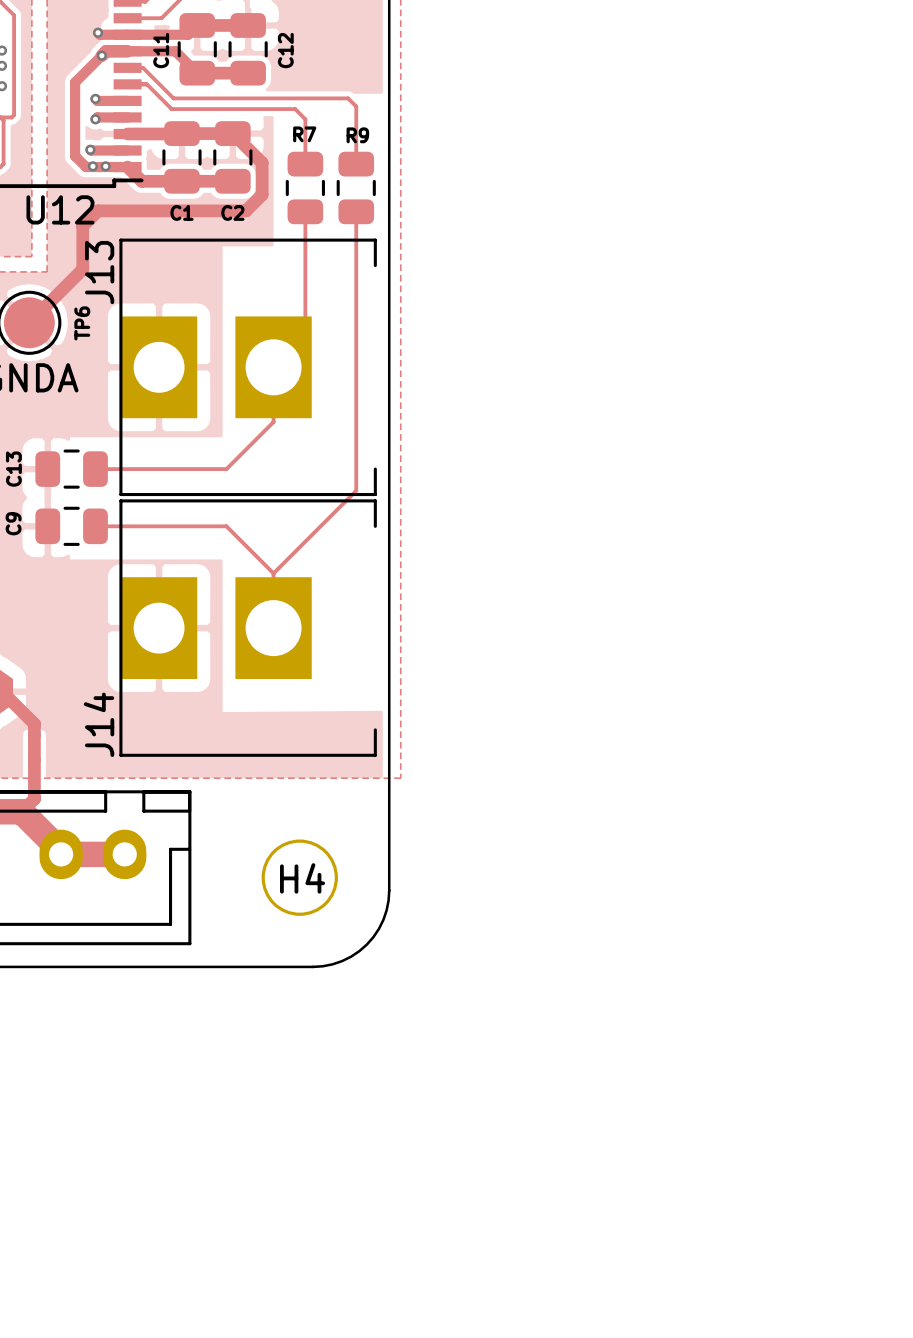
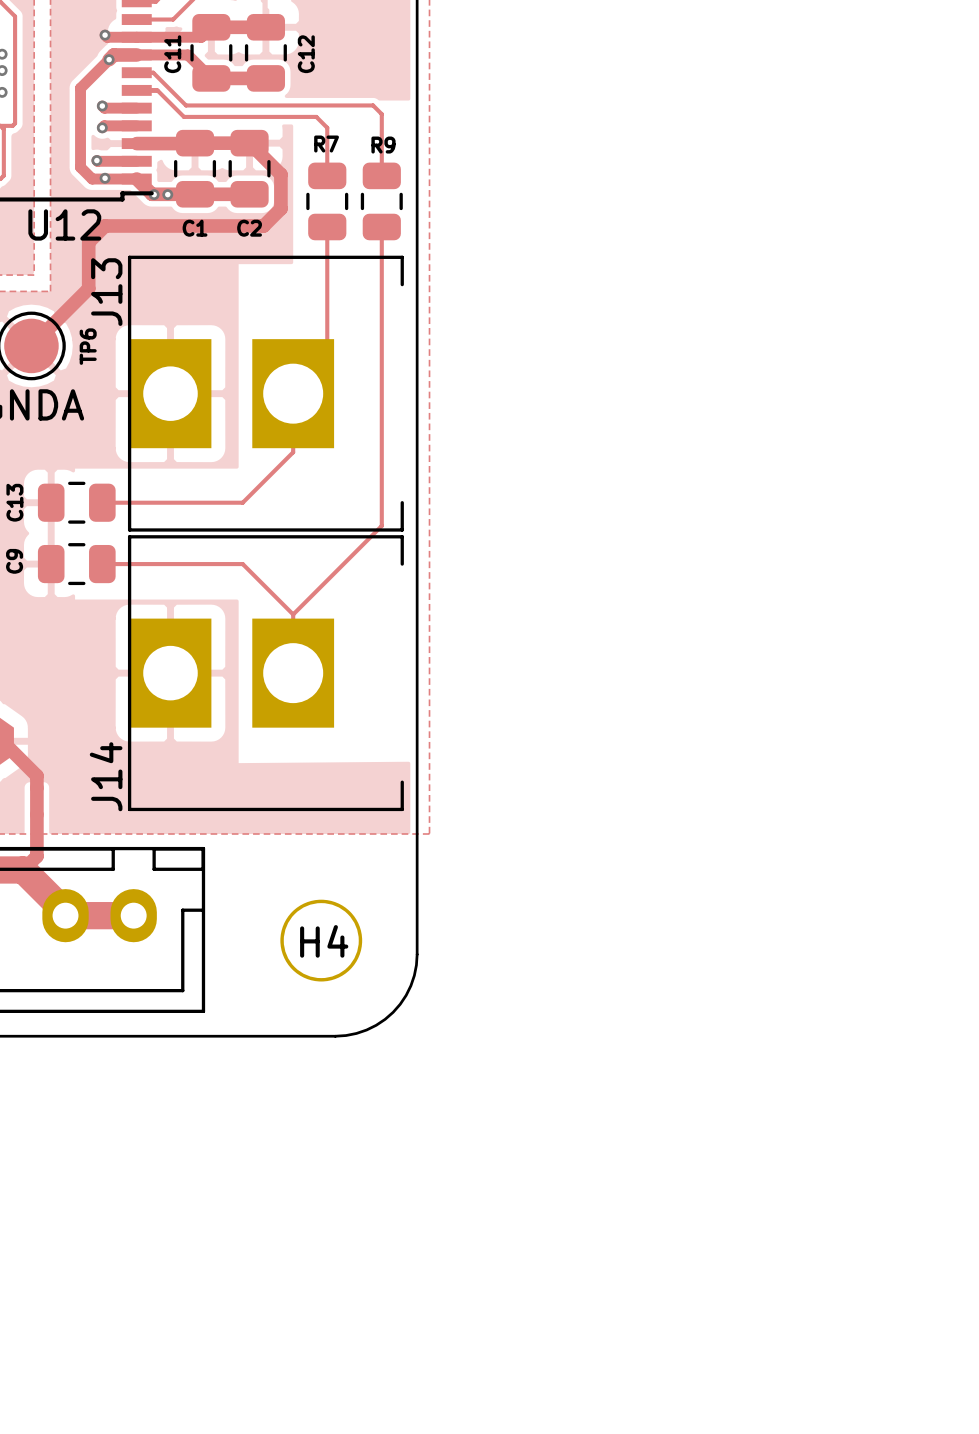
via: (92, 166) -> none
via: none -> (105, 178)
via: (105, 166) -> none
via: none -> (154, 194)
via: none -> (167, 194)

